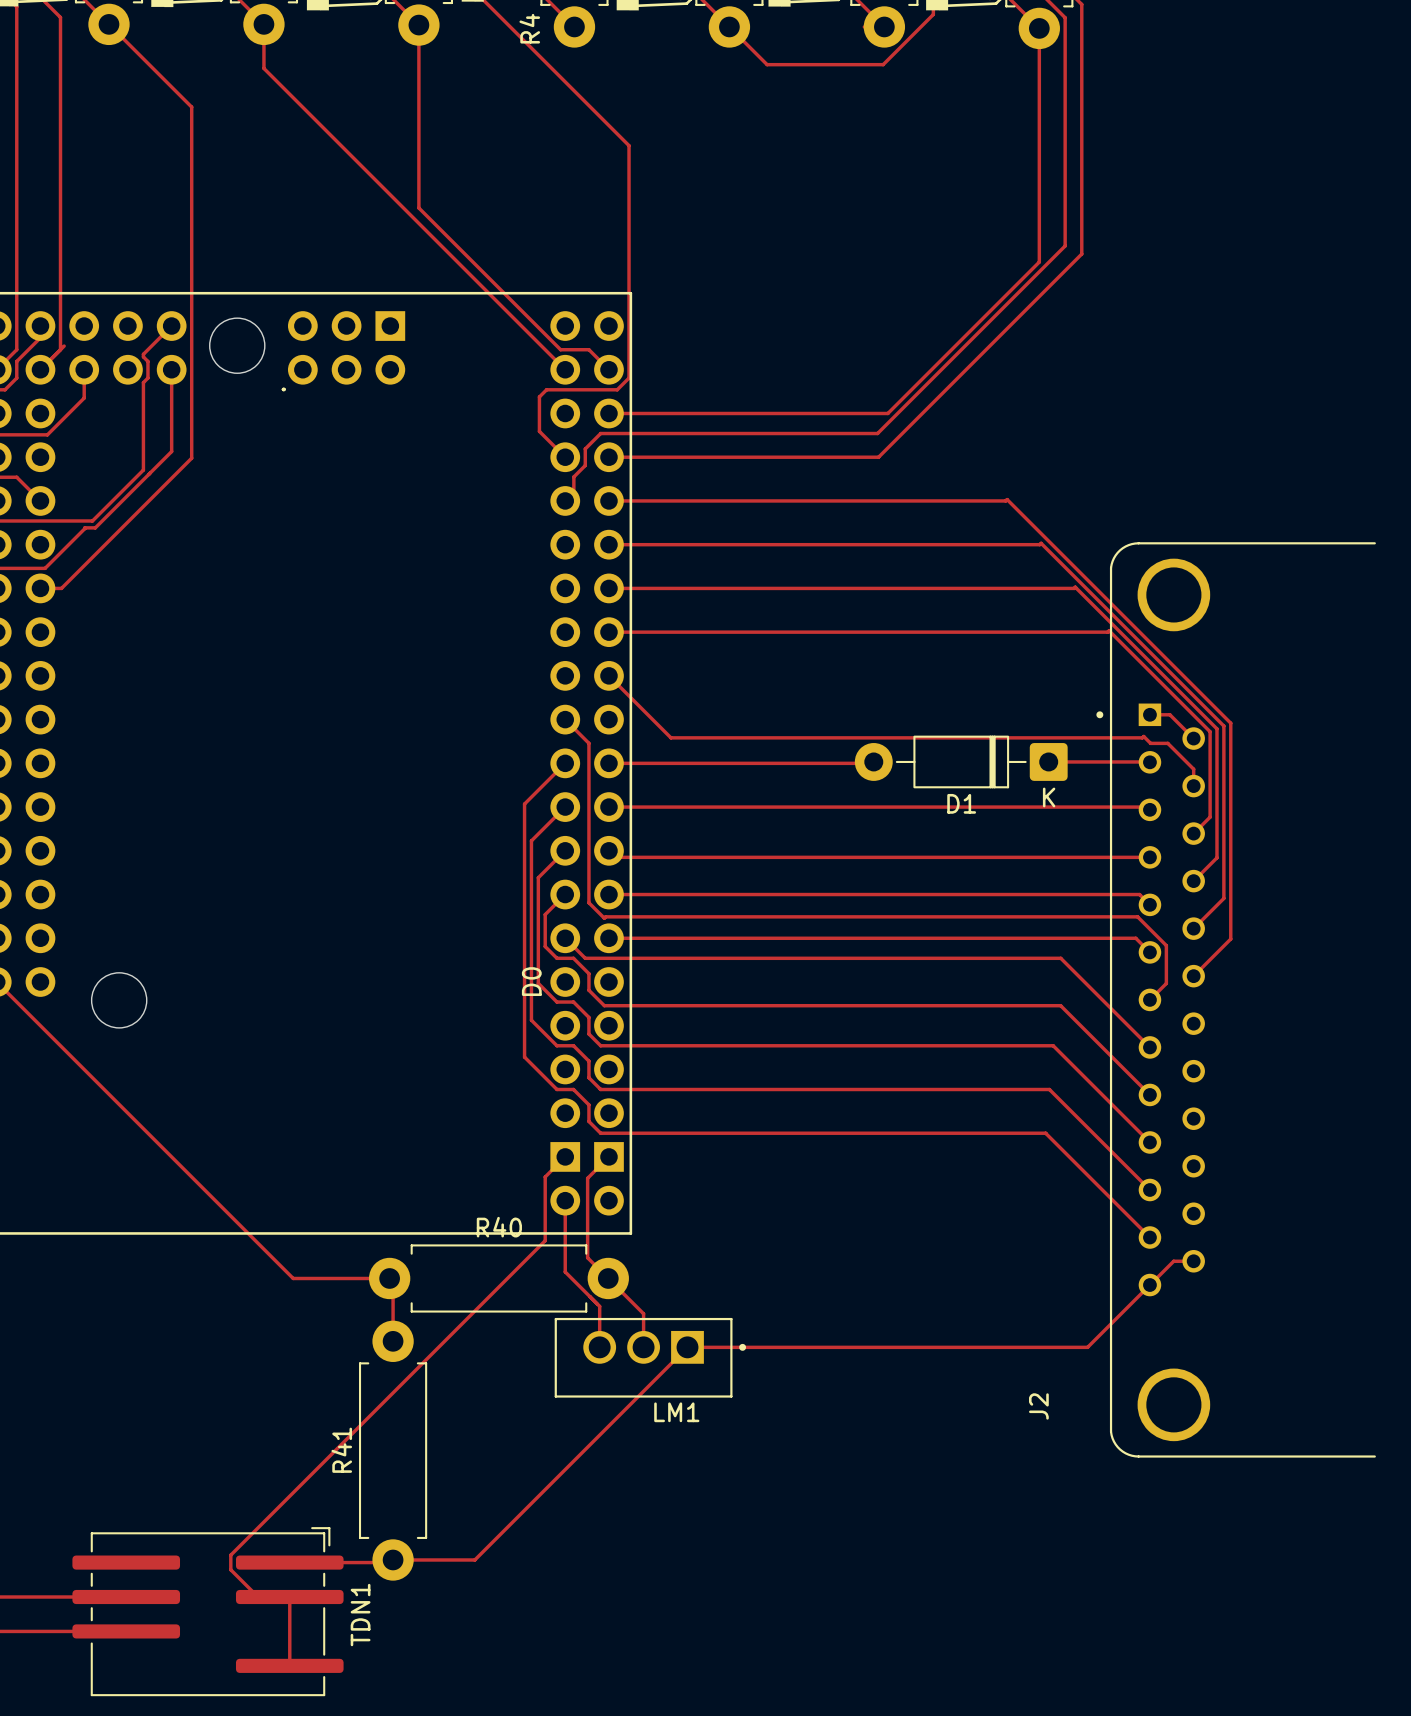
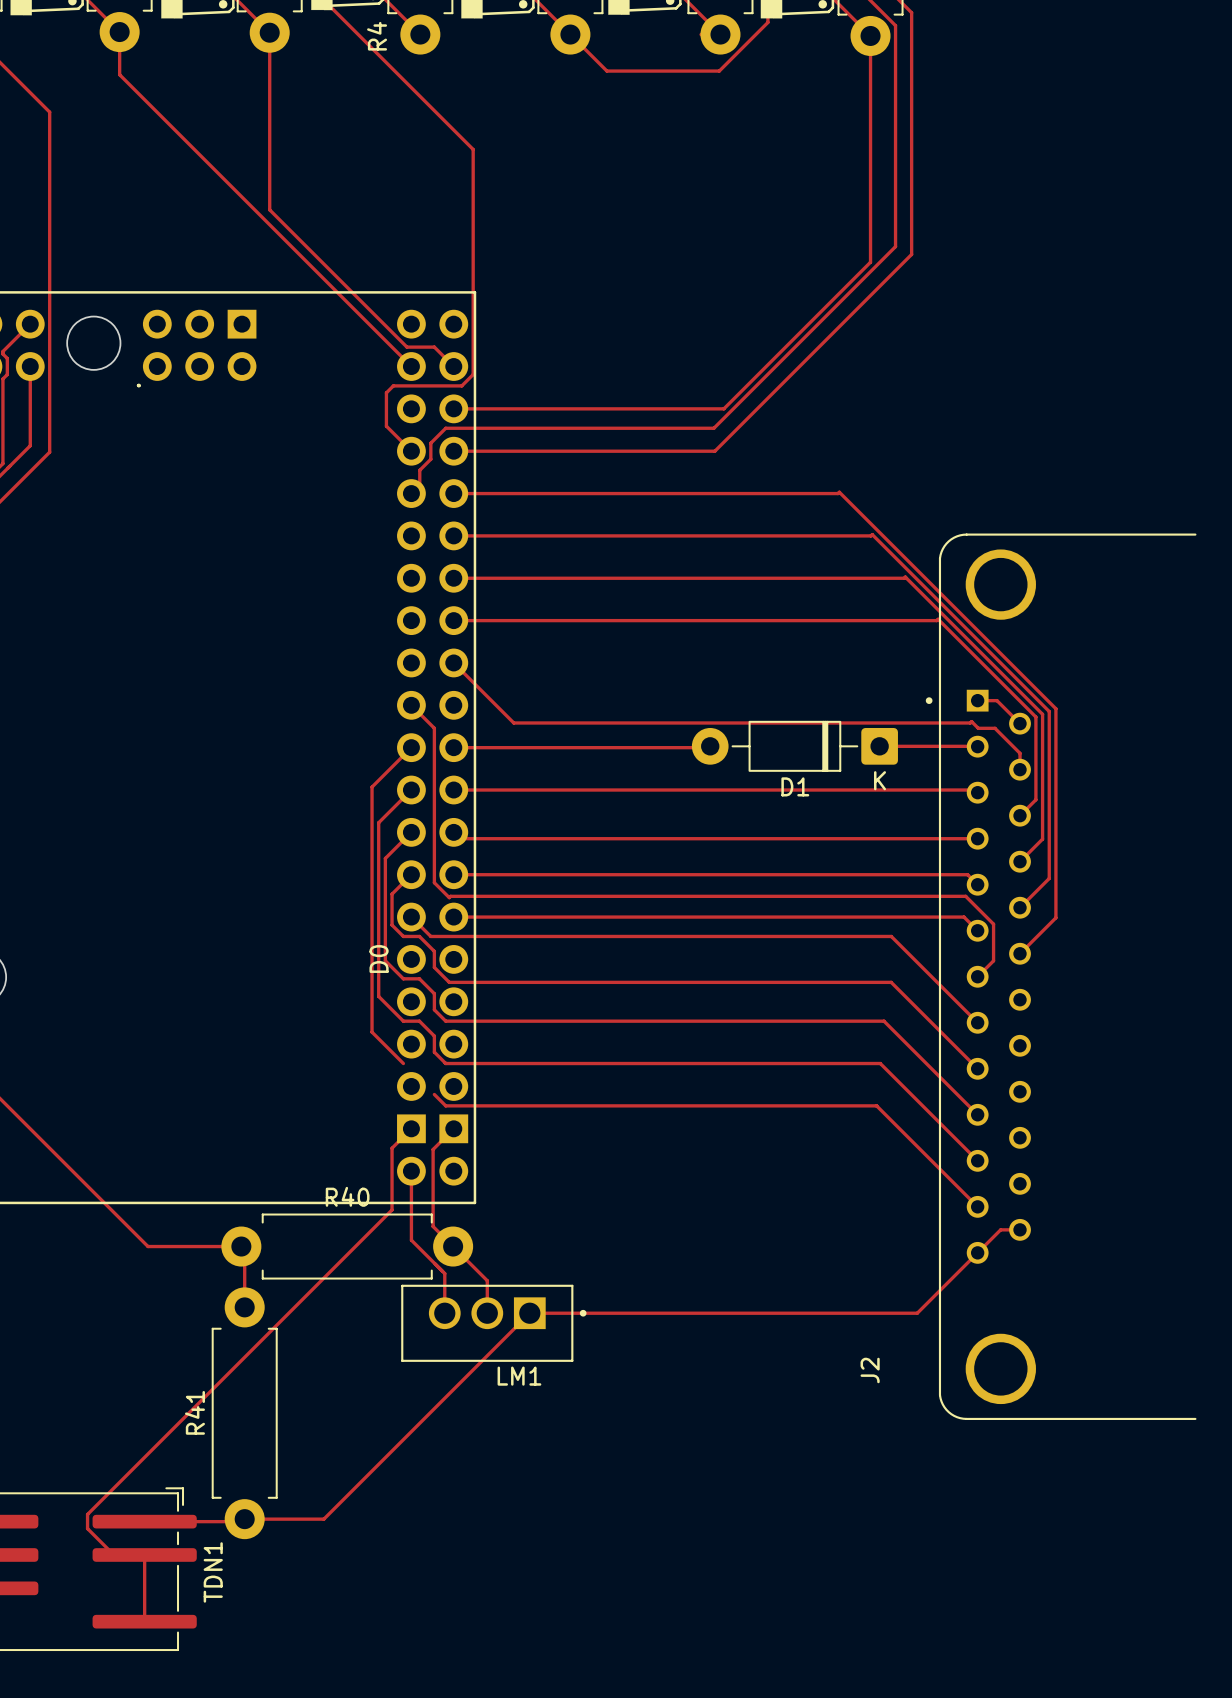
track: (556, 1089) (573, 1089) (588, 1104) (588, 1121) -> none

